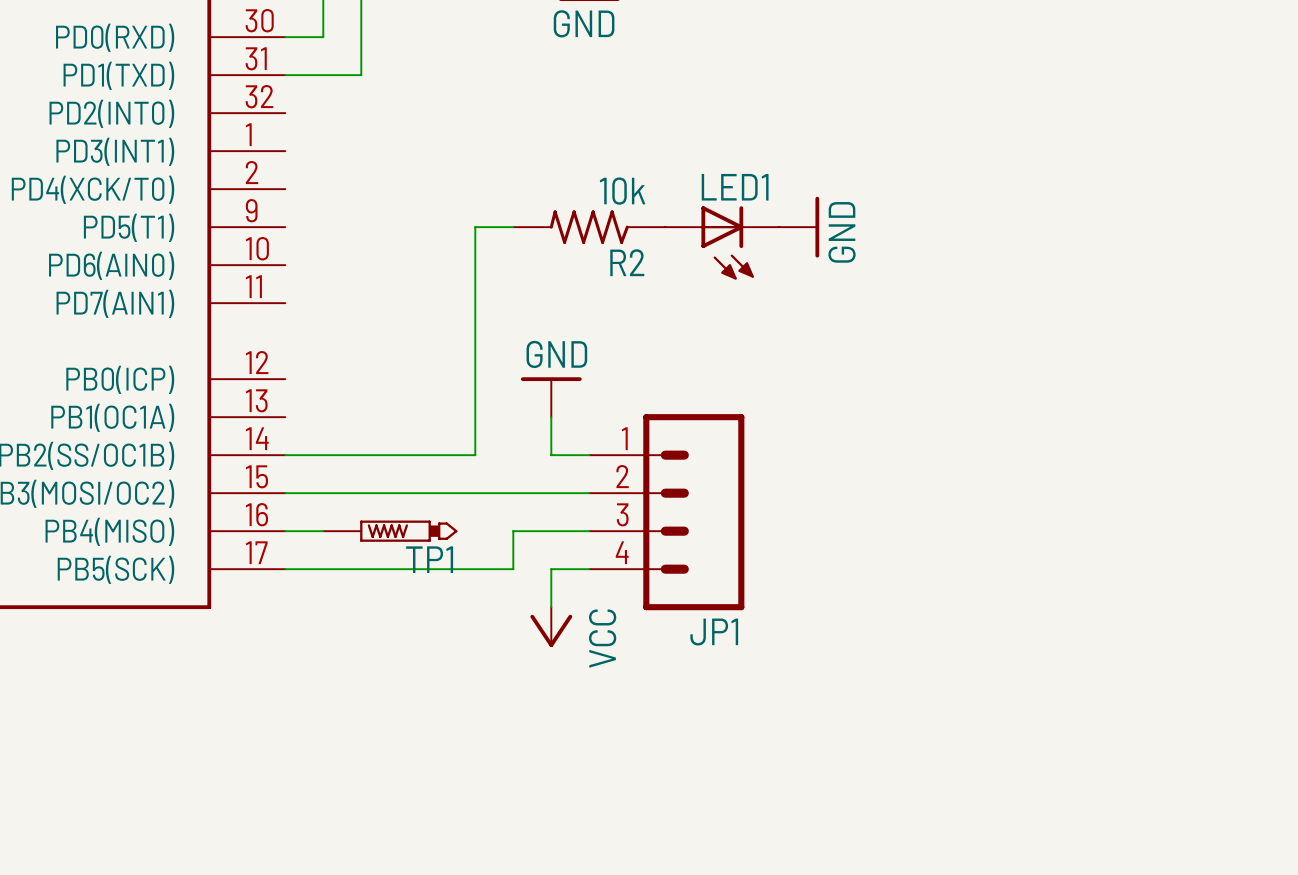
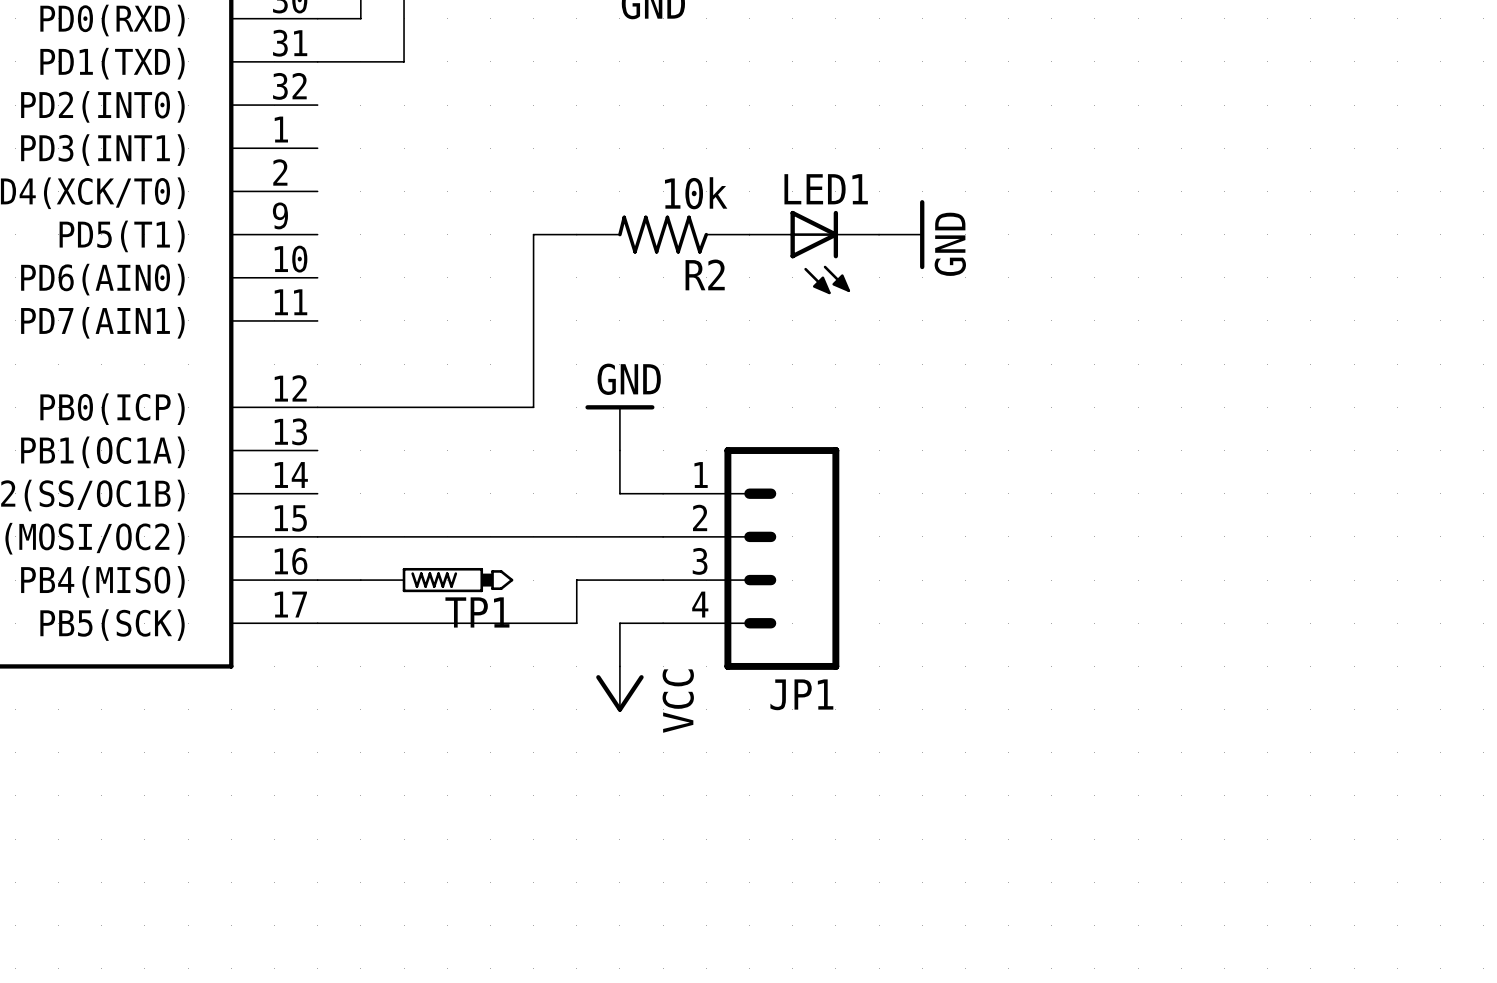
wire: (475, 379) (475, 455) (285, 455) -> (533, 407) (317, 407)

